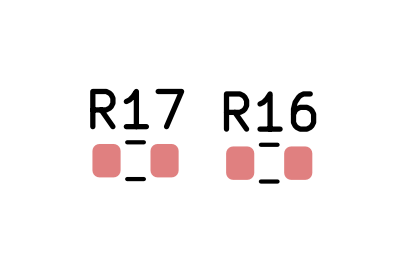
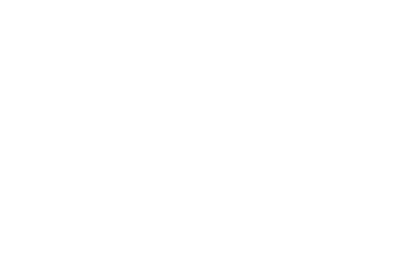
R17: (135, 160) -> none
R16: (269, 163) -> none

